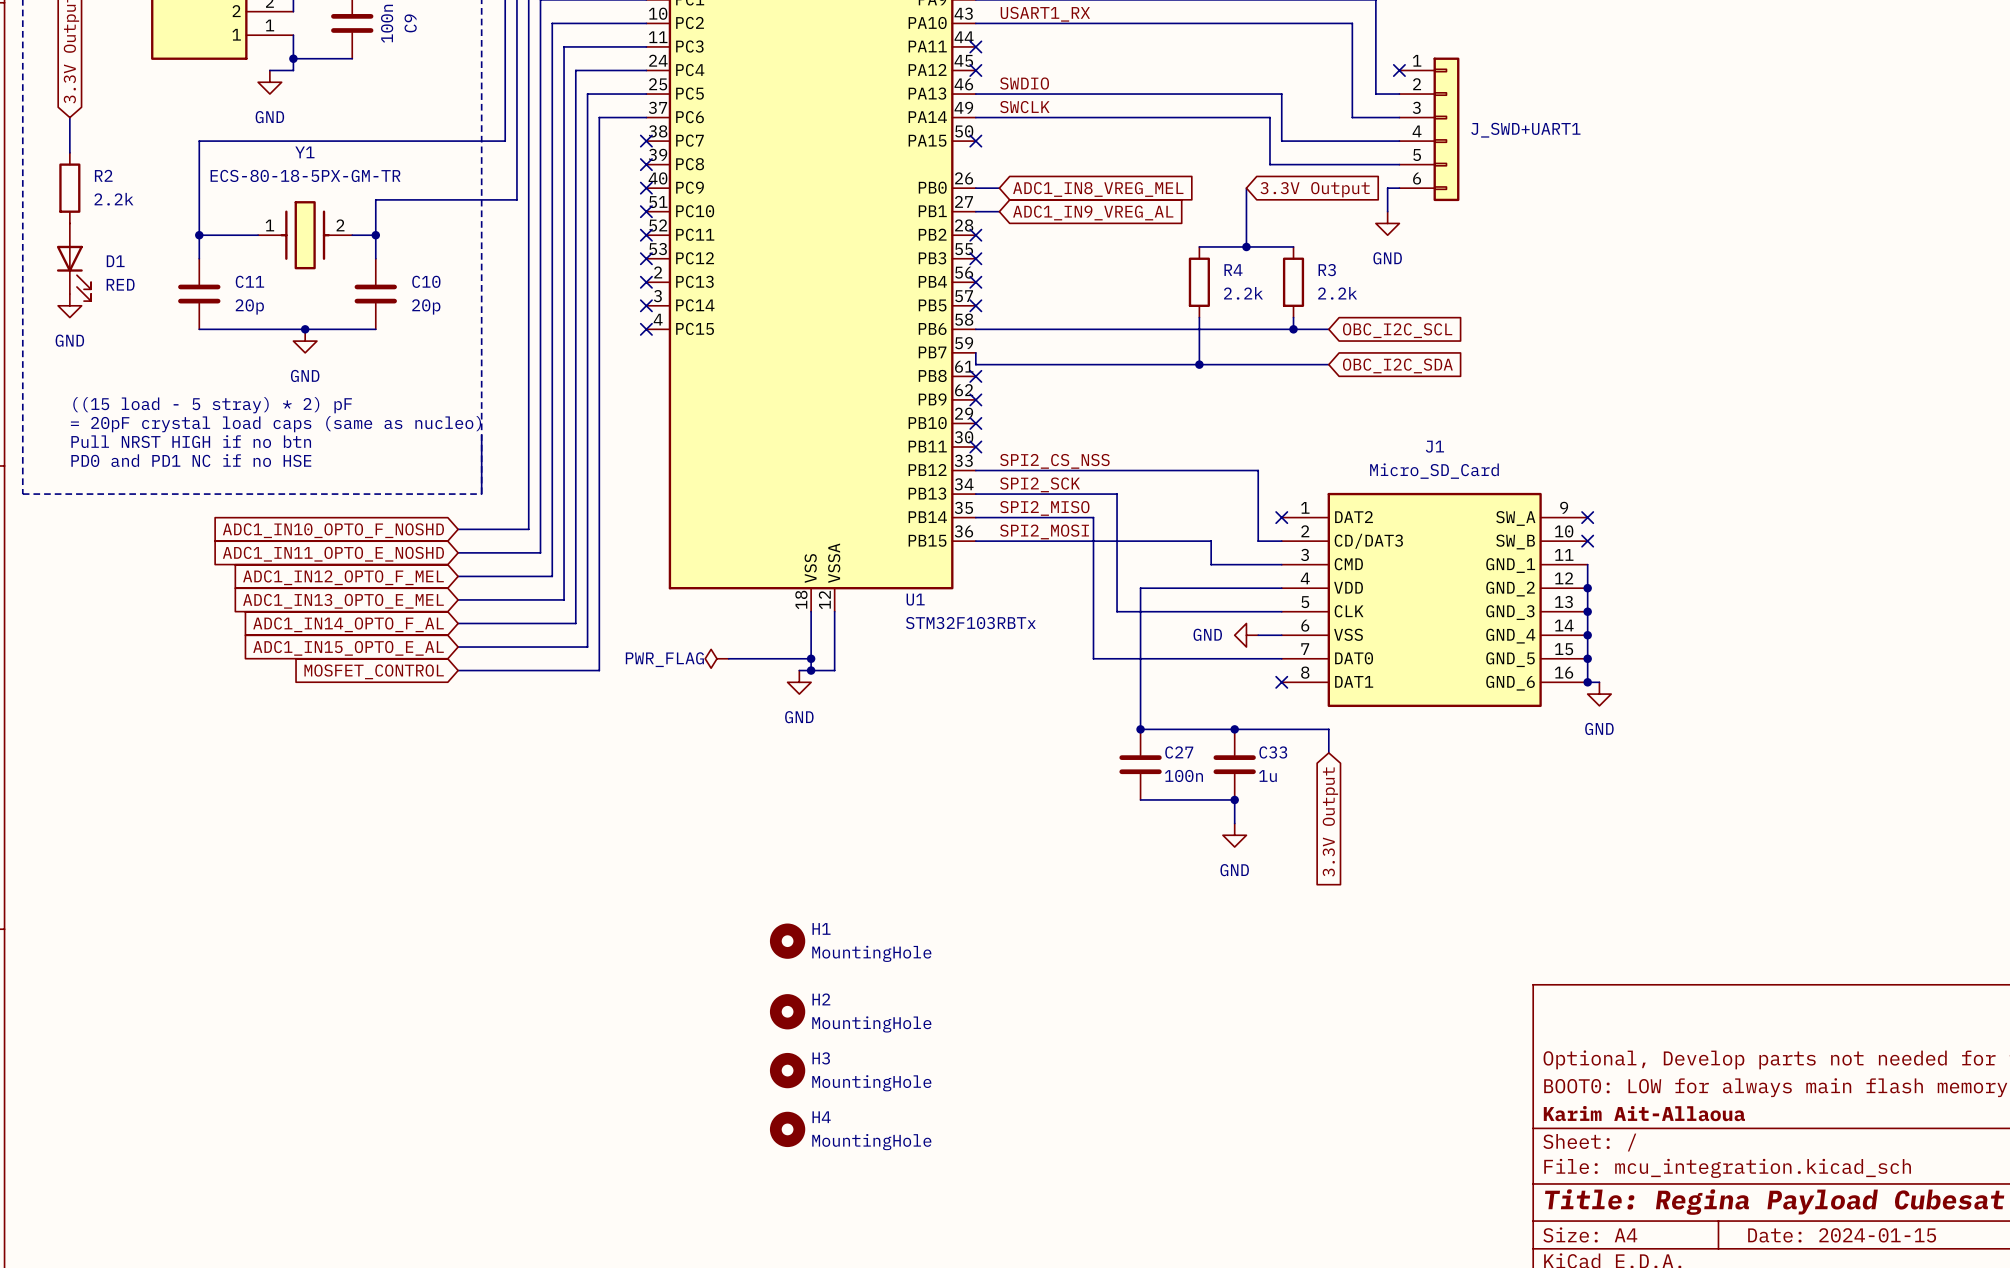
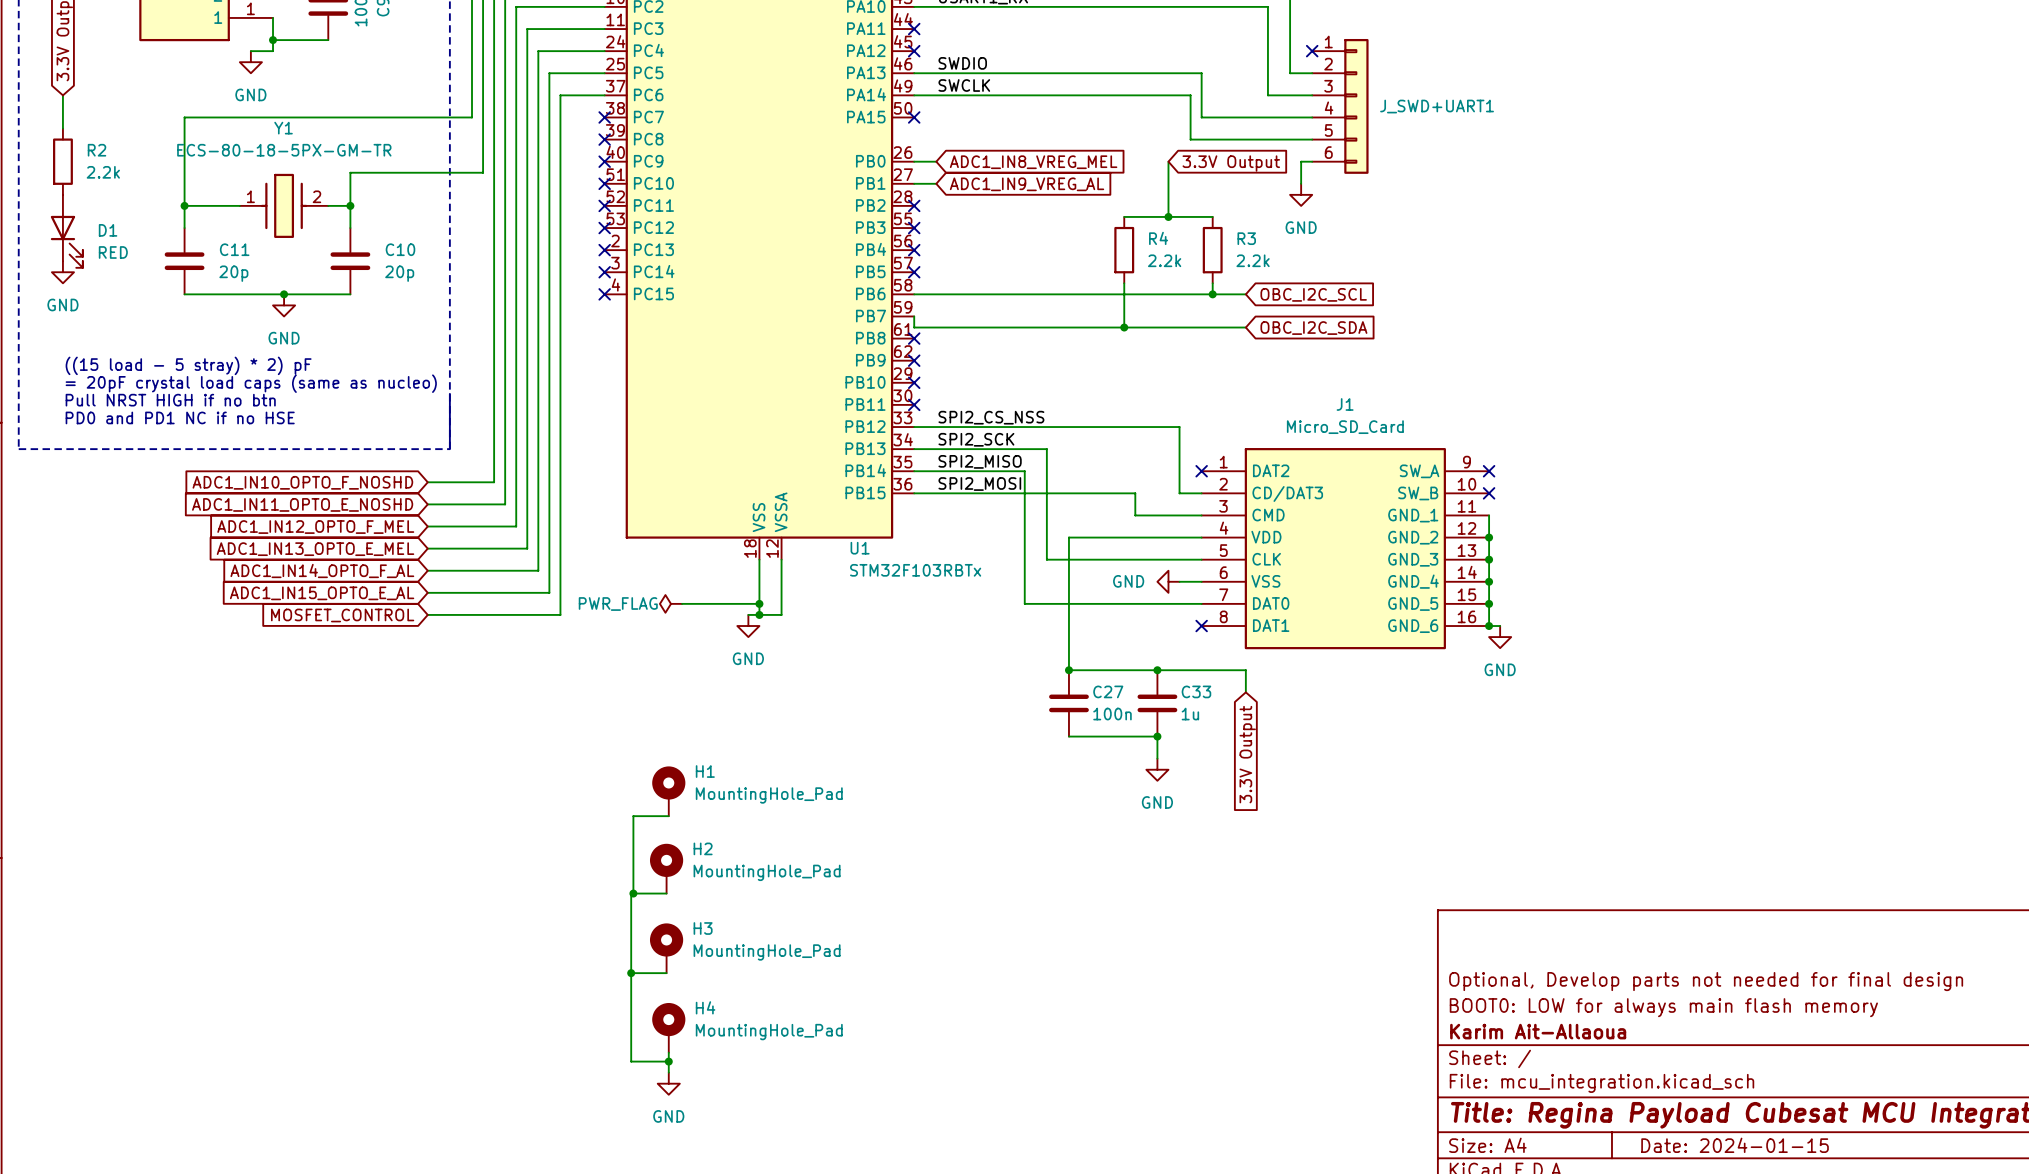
wire: none -> (668, 816) (633, 816) (633, 893)
H1 symbol: [769, 923, 806, 959] -> [652, 766, 686, 817]
H1 value: MountingHole (871, 953) -> MountingHole_Pad (769, 795)
junction: none -> (633, 893)
wire: none -> (666, 893) (631, 893) (631, 1061) (668, 1061)
H2 symbol: [769, 994, 806, 1030] -> [649, 843, 684, 894]
H2 value: MountingHole (871, 1024) -> MountingHole_Pad (767, 872)
wire: none -> (631, 973) (666, 973)
junction: none -> (631, 973)
H3 symbol: [769, 1052, 806, 1089] -> [649, 923, 684, 974]
H3 value: MountingHole (871, 1083) -> MountingHole_Pad (767, 952)
H4 symbol: [769, 1111, 806, 1148] -> [652, 1002, 686, 1053]
wire: none -> (668, 1052) (668, 1072)
H4 value: MountingHole (871, 1142) -> MountingHole_Pad (769, 1032)
junction: none -> (668, 1061)
power symbol: none -> GND (668, 1083)

